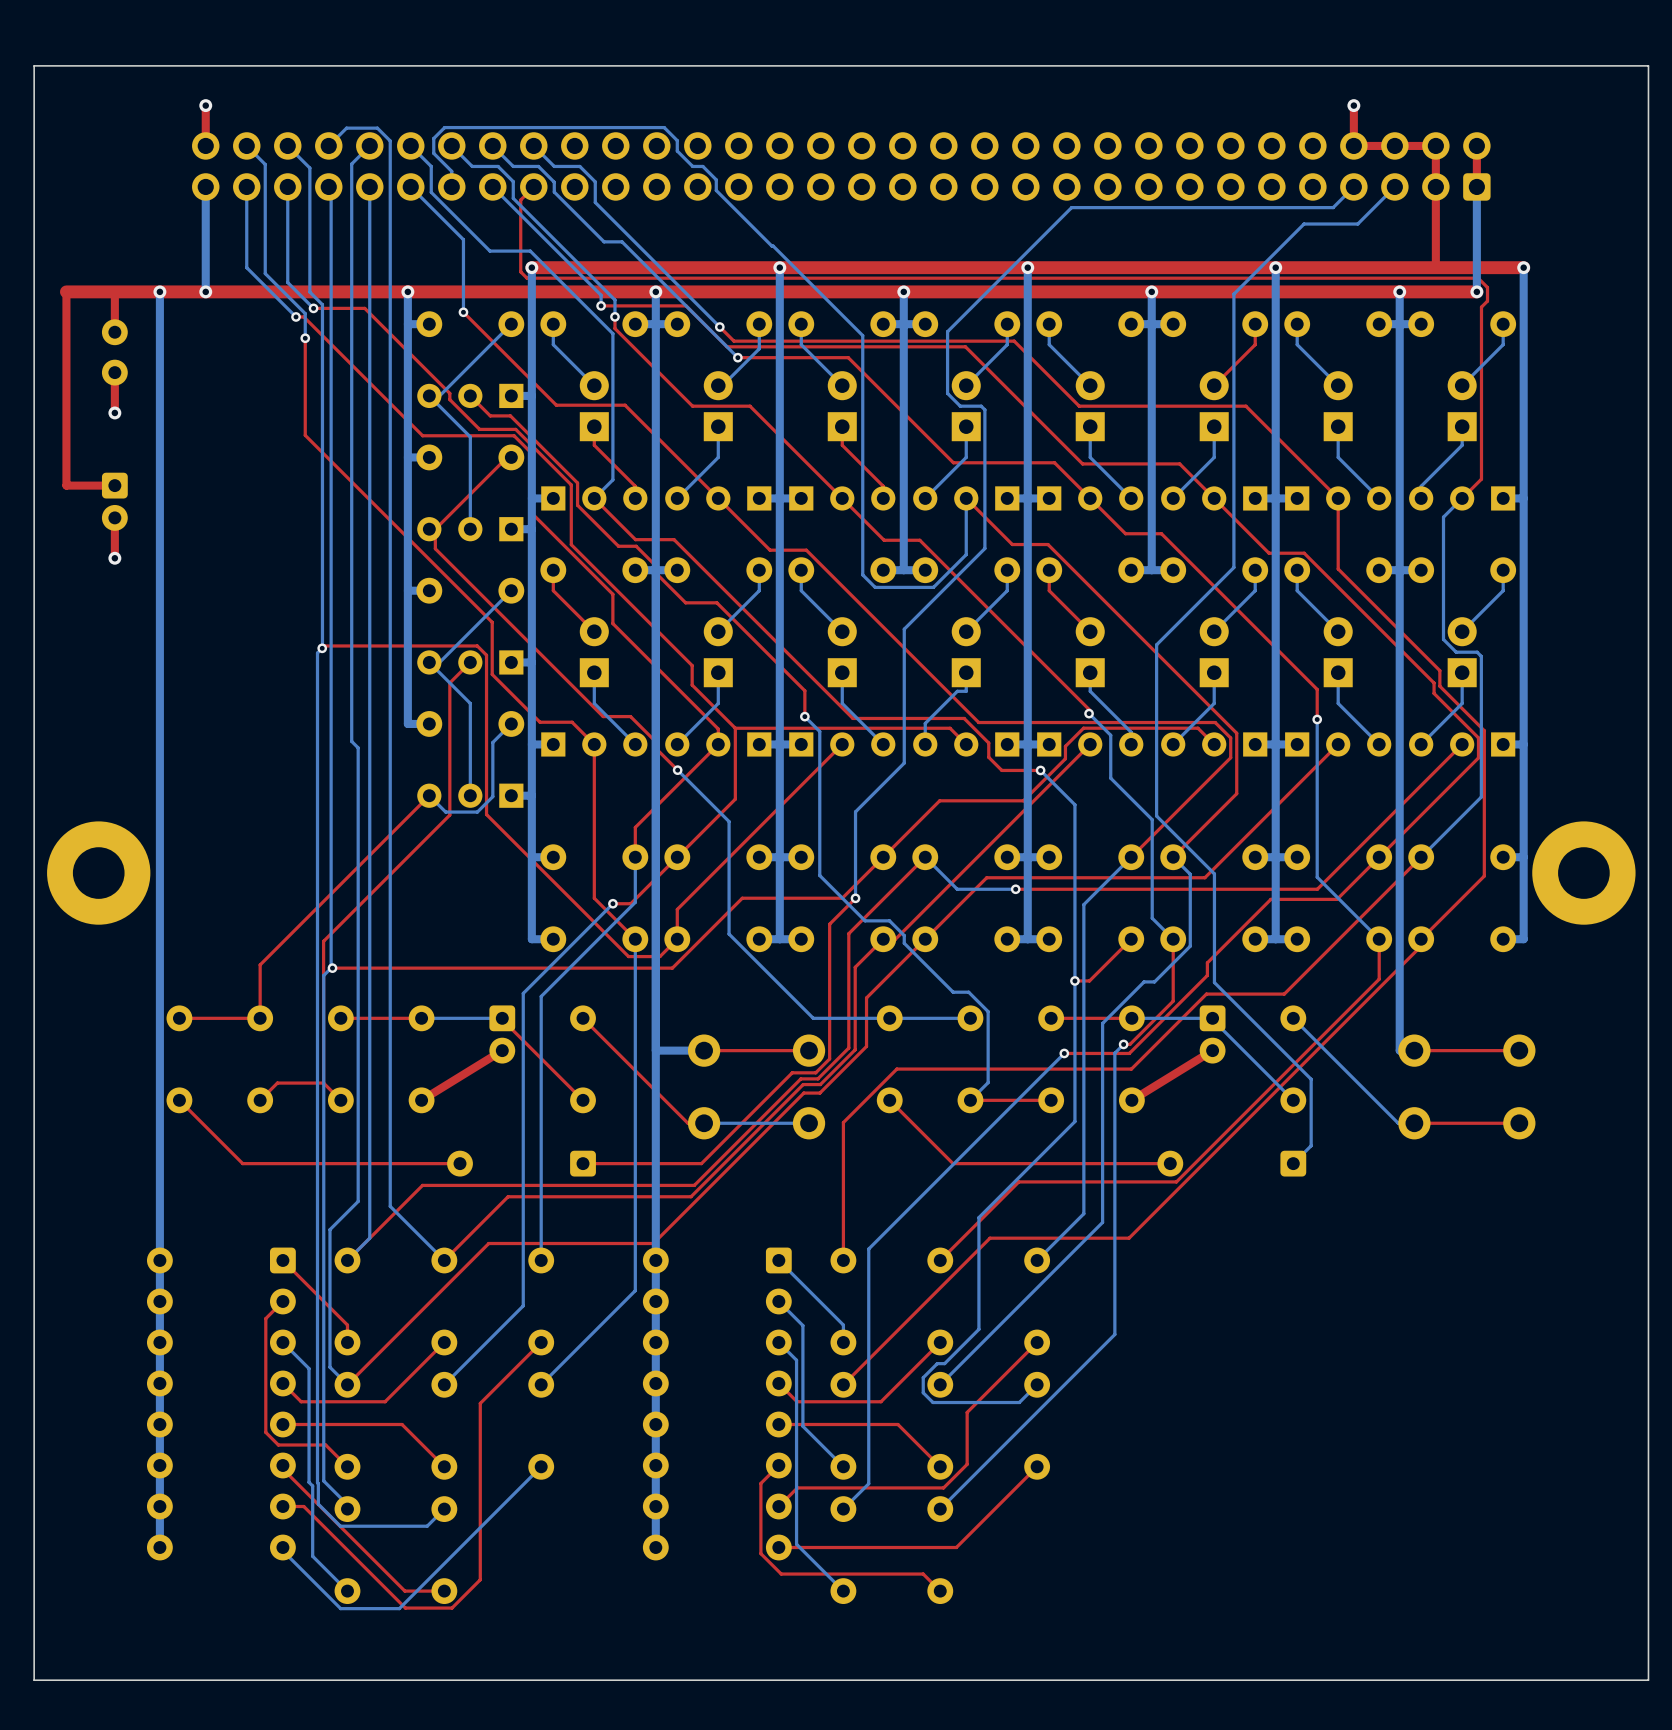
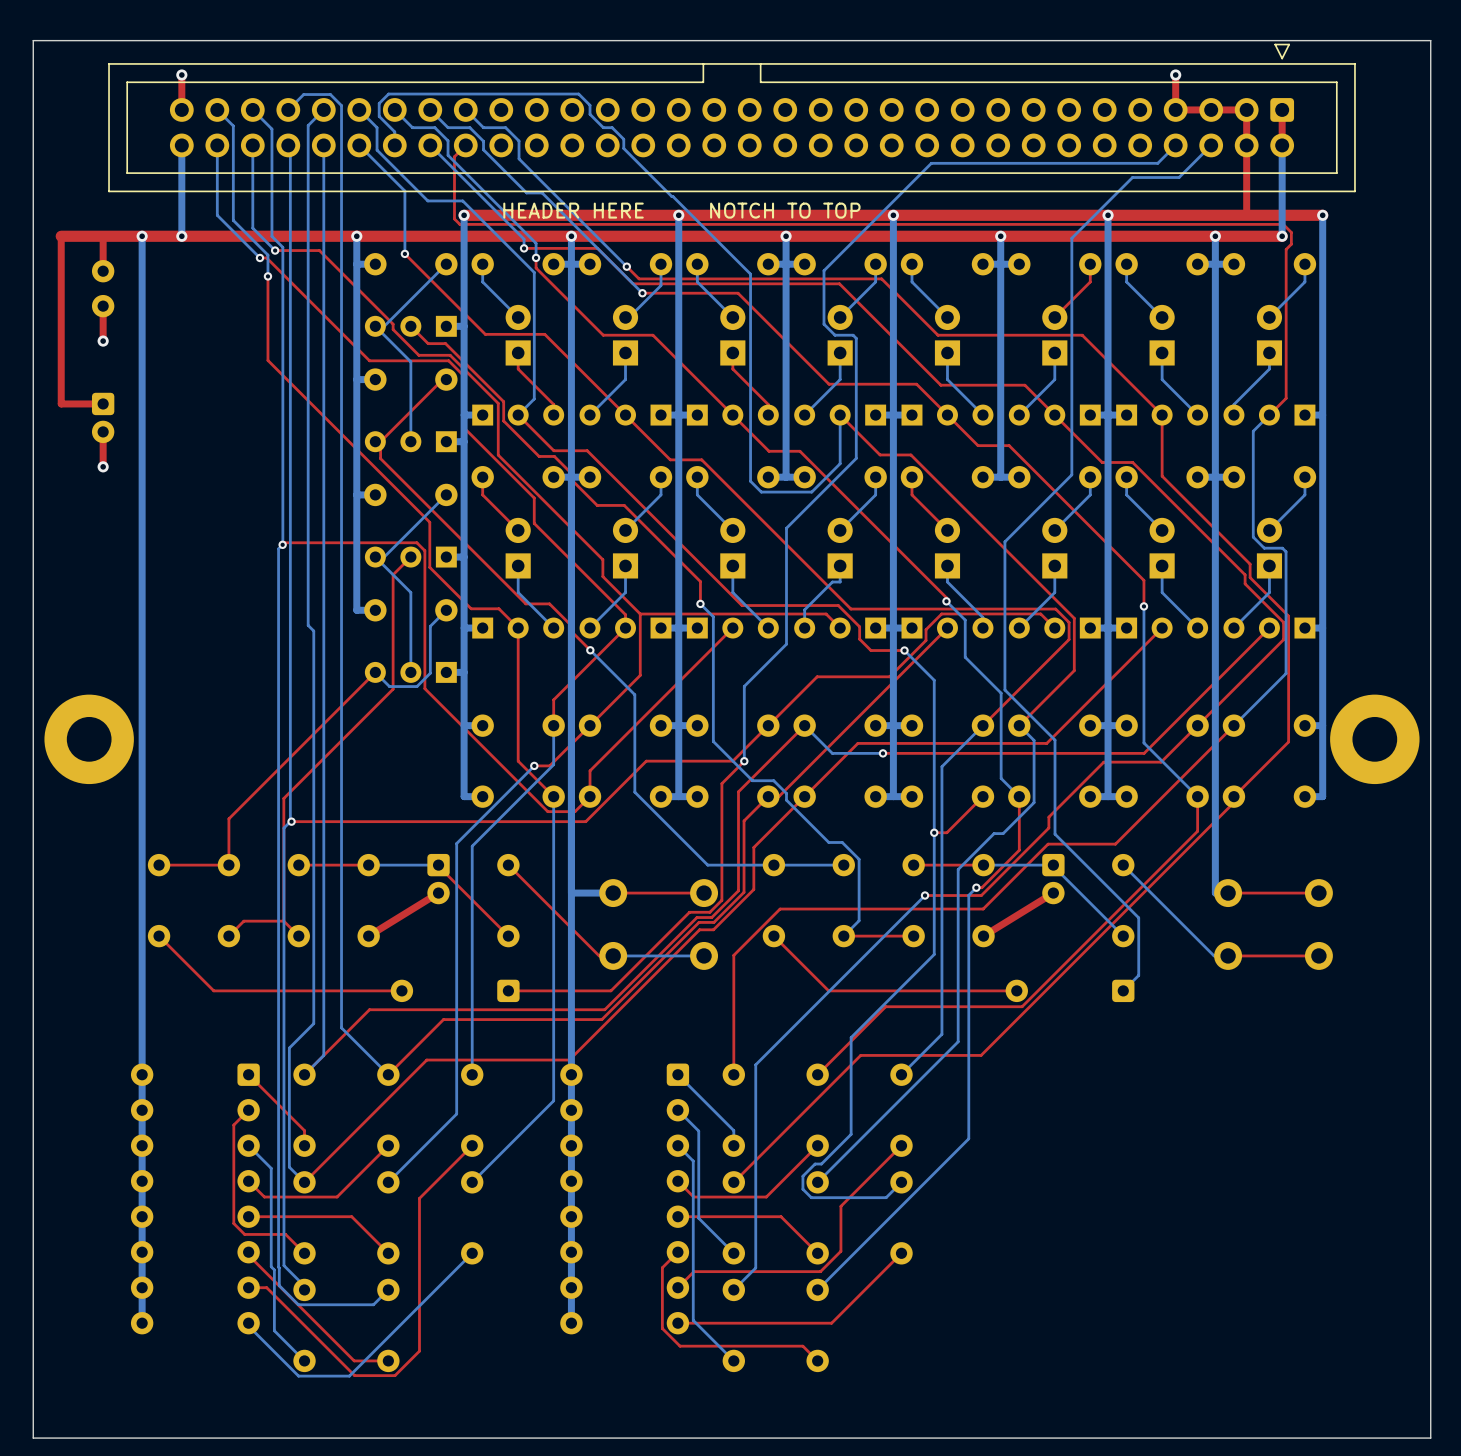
part side: top (841, 166) -> bottom (732, 117)
text: none -> HEADER HERE (573, 210)
text: none -> NOTCH TO TOP (785, 210)

